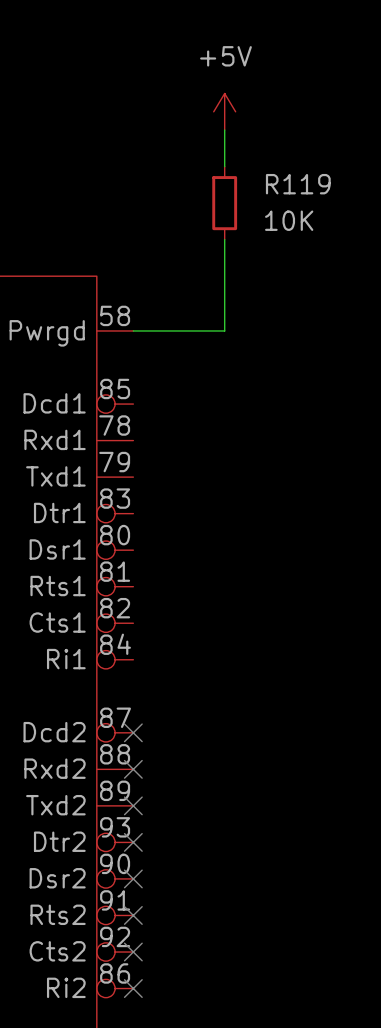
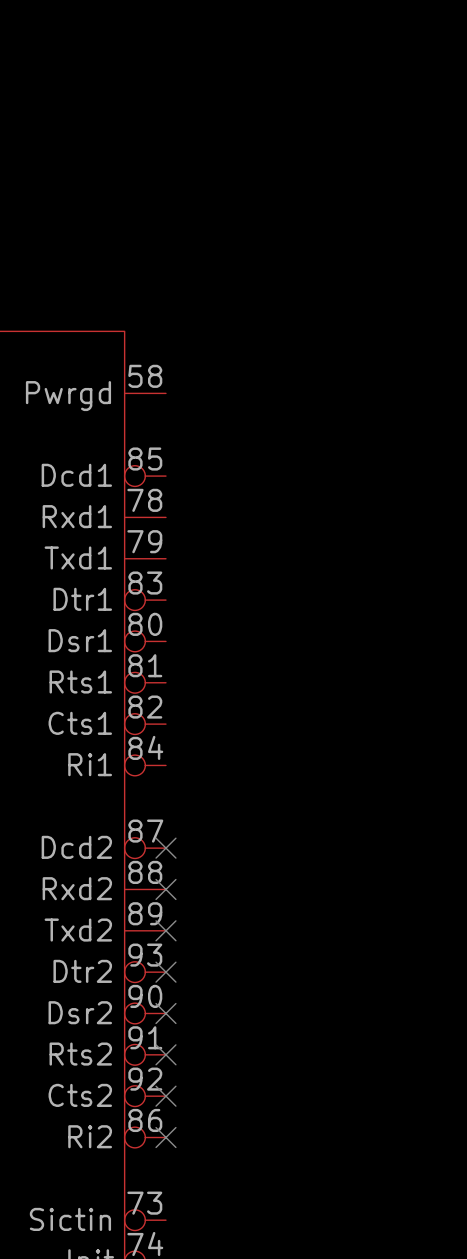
power symbol: +5V (224, 111) -> none
wire: (224, 130) (224, 166) -> none
R119: 10K (224, 203) -> none
wire: (224, 239) (224, 330) (133, 330) -> none

